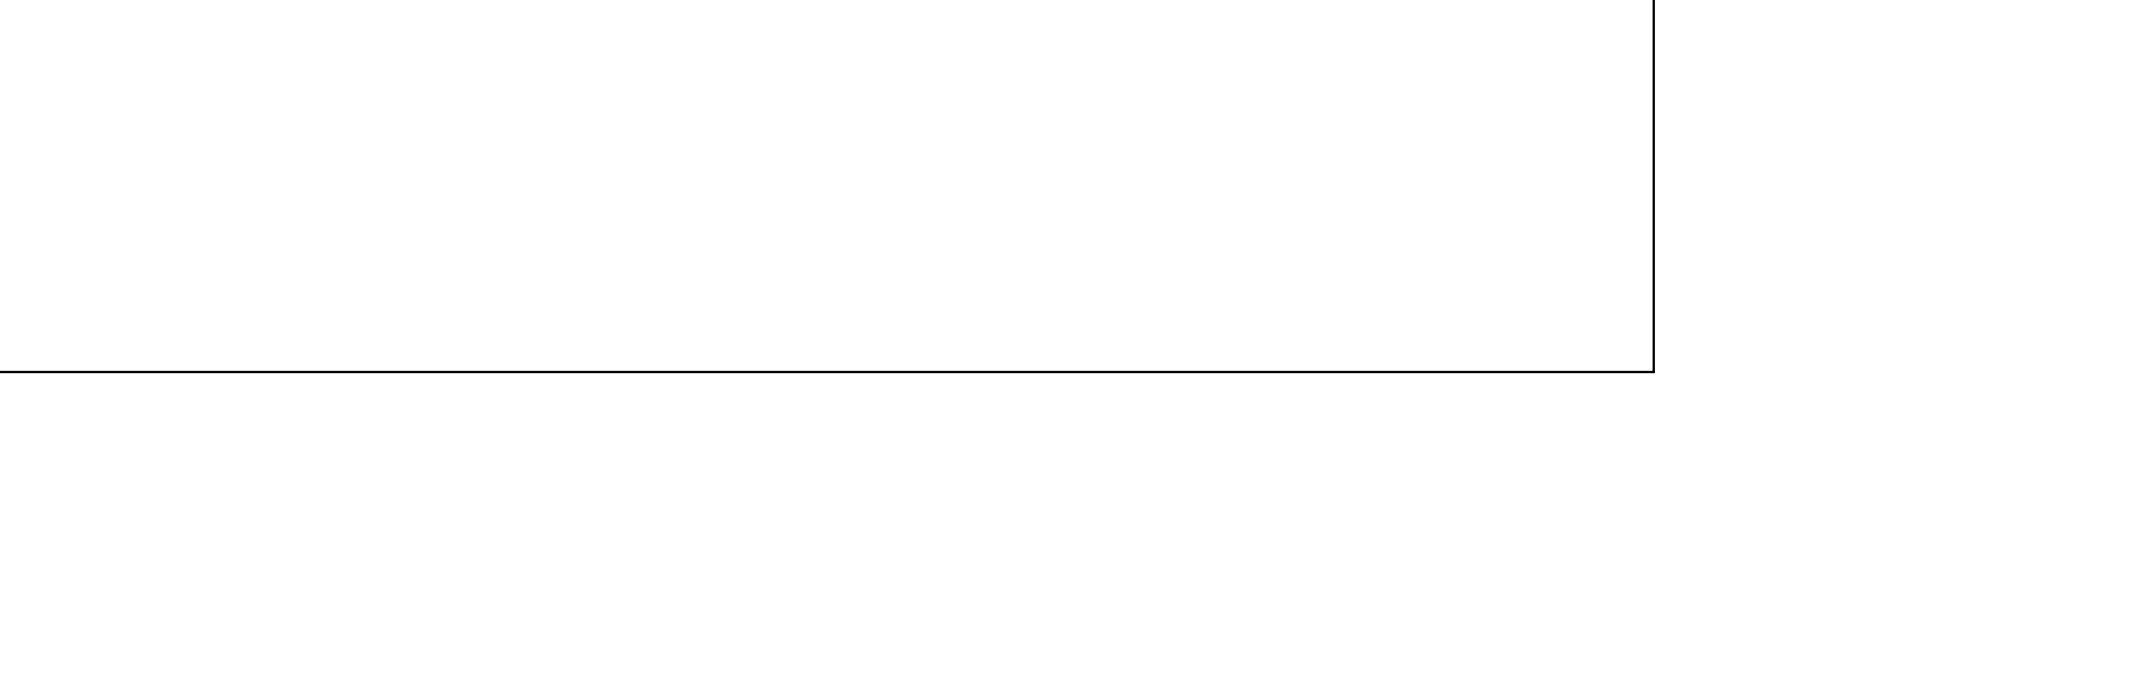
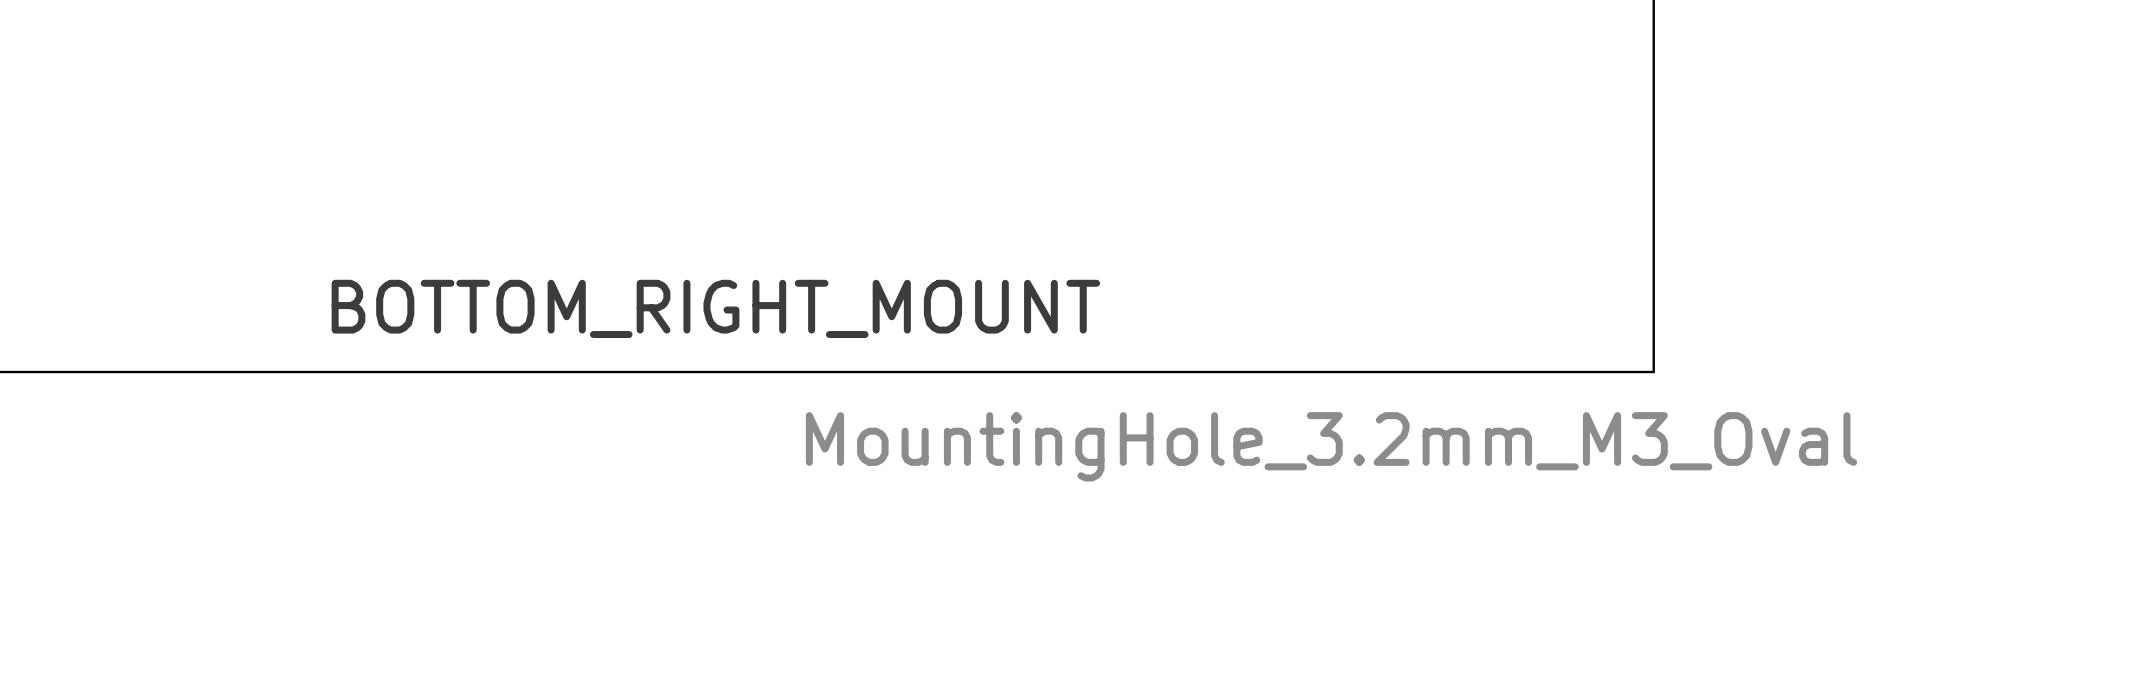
BOTTOM_RIGHT_MOUNT name: none -> BOTTOM_RIGHT_MOUNT (715, 308)
BOTTOM_RIGHT_MOUNT value: none -> MountingHole_3.2mm_M3_Oval (1331, 446)

